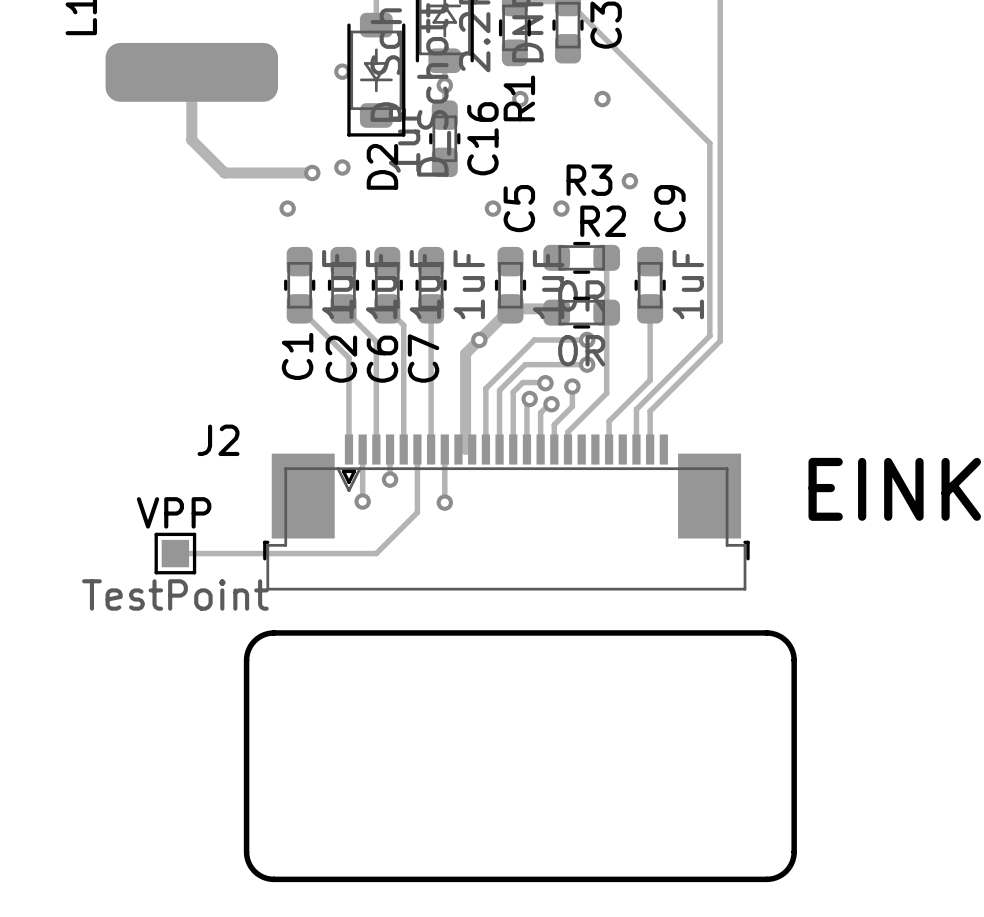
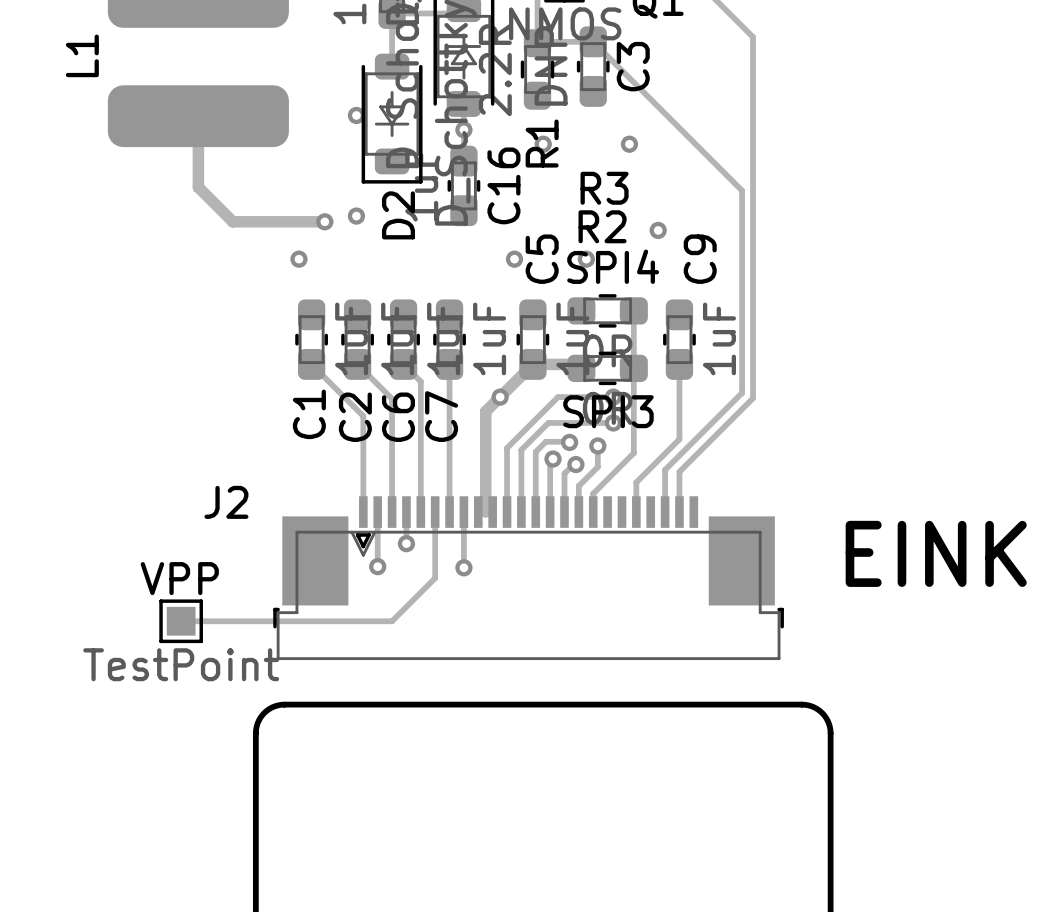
R3 name position: R3 (589, 180) -> R3 (604, 188)
text: none -> SPI4 (613, 266)
R2 name position: R2 (603, 221) -> R2 (602, 226)
text: none -> SPI3 (608, 411)

